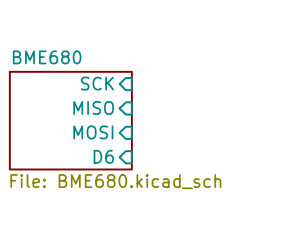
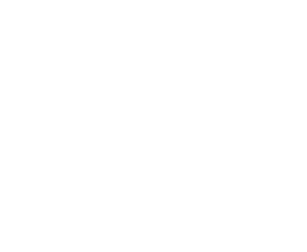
sheet pin: SCK (97, 83) -> none
sheet pin: MISO (93, 107) -> none
sheet BME680: File: BME680.kicad_sch (70, 120) -> none
sheet pin: MOSI (93, 132) -> none
sheet pin: D6 (103, 156) -> none

